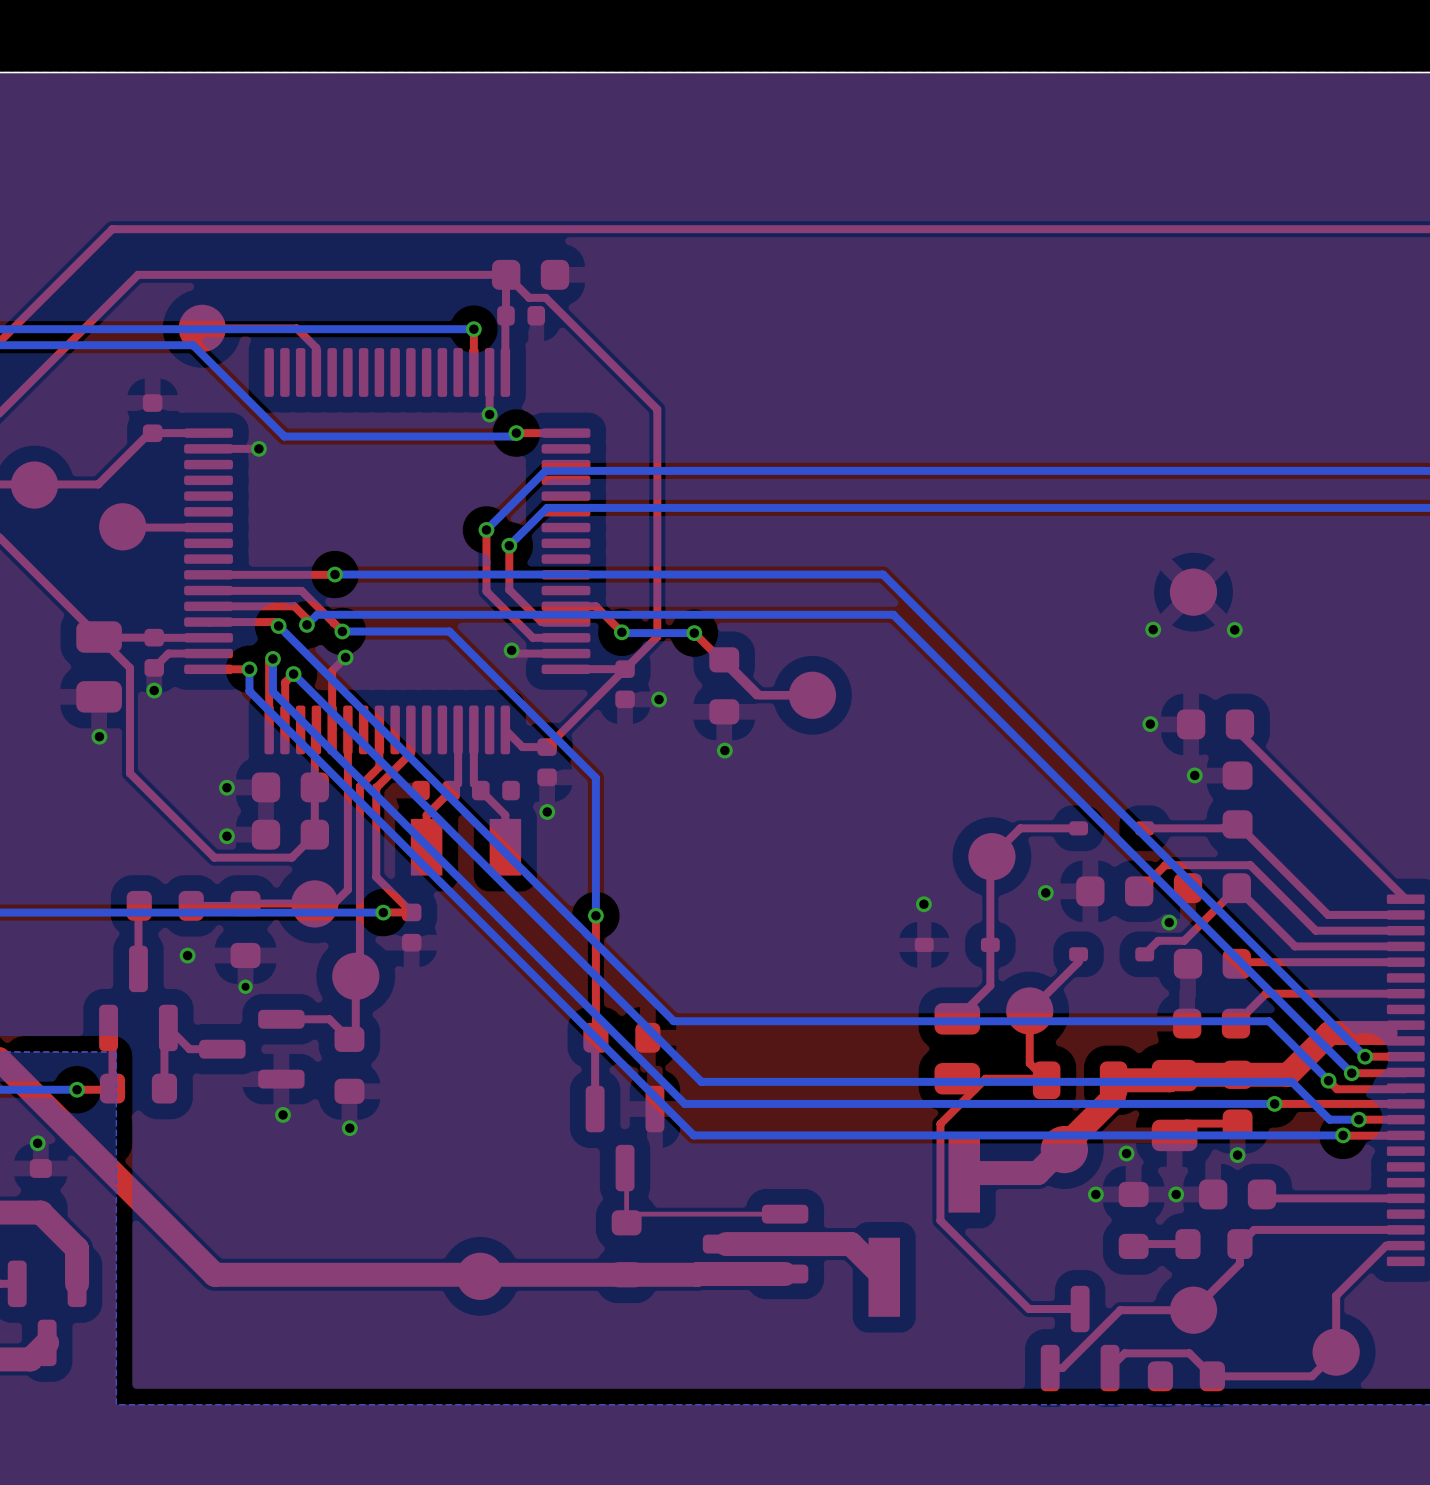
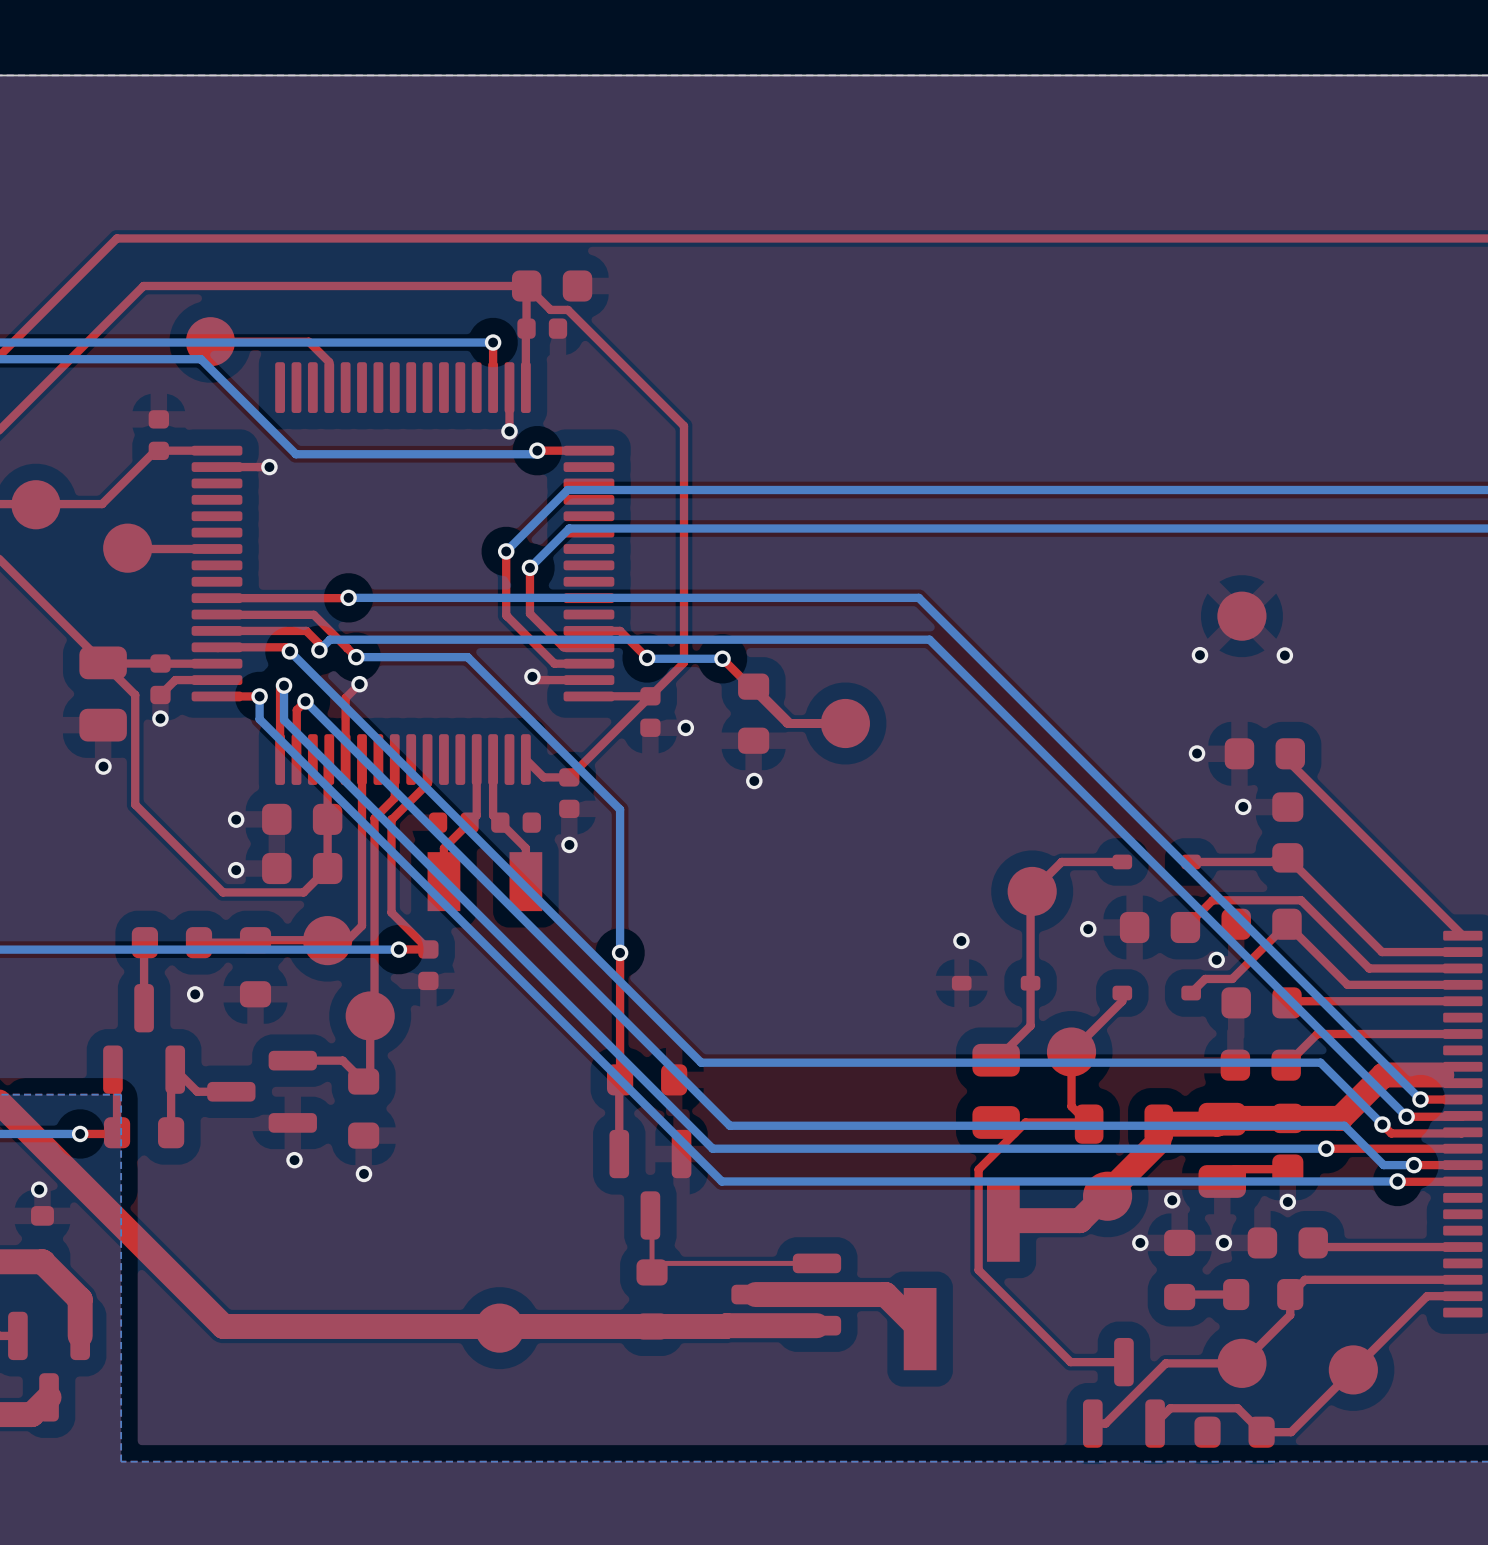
via: (245, 986) -> none
top track: (1386, 1245) (1336, 1295) (1336, 1352) (1311, 1376) (1240, 1376) -> (1442, 1296) (1427, 1296) (1291, 1432)
part position: (1336, 1352) -> (1353, 1369)

